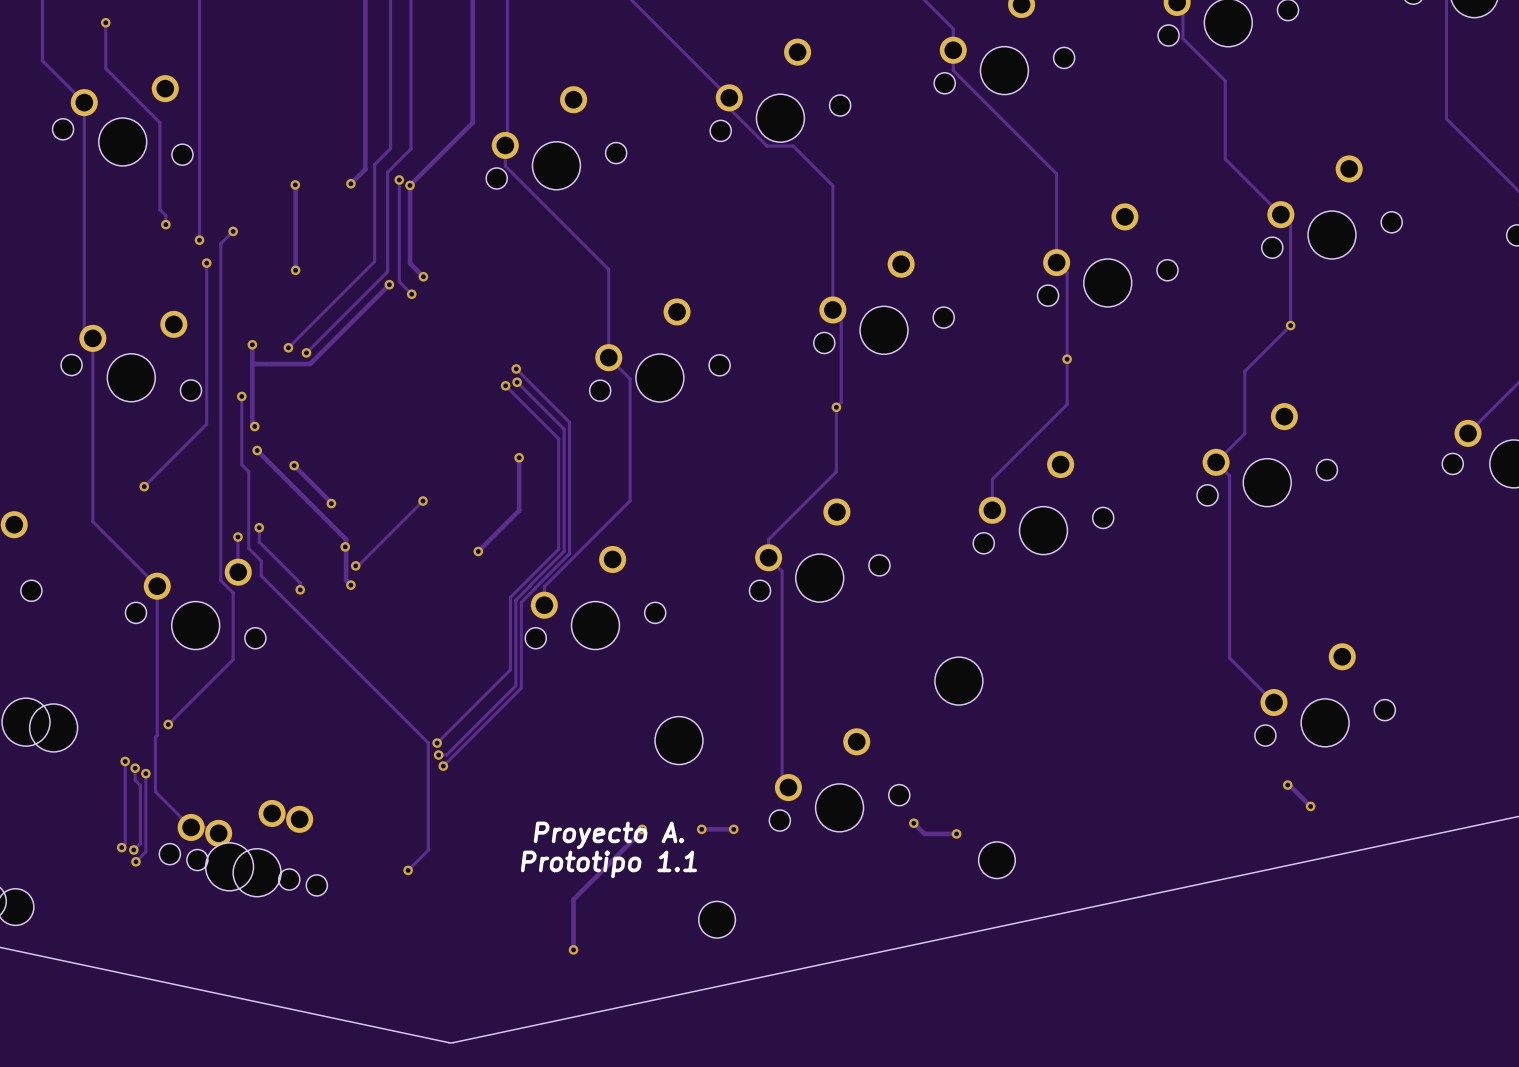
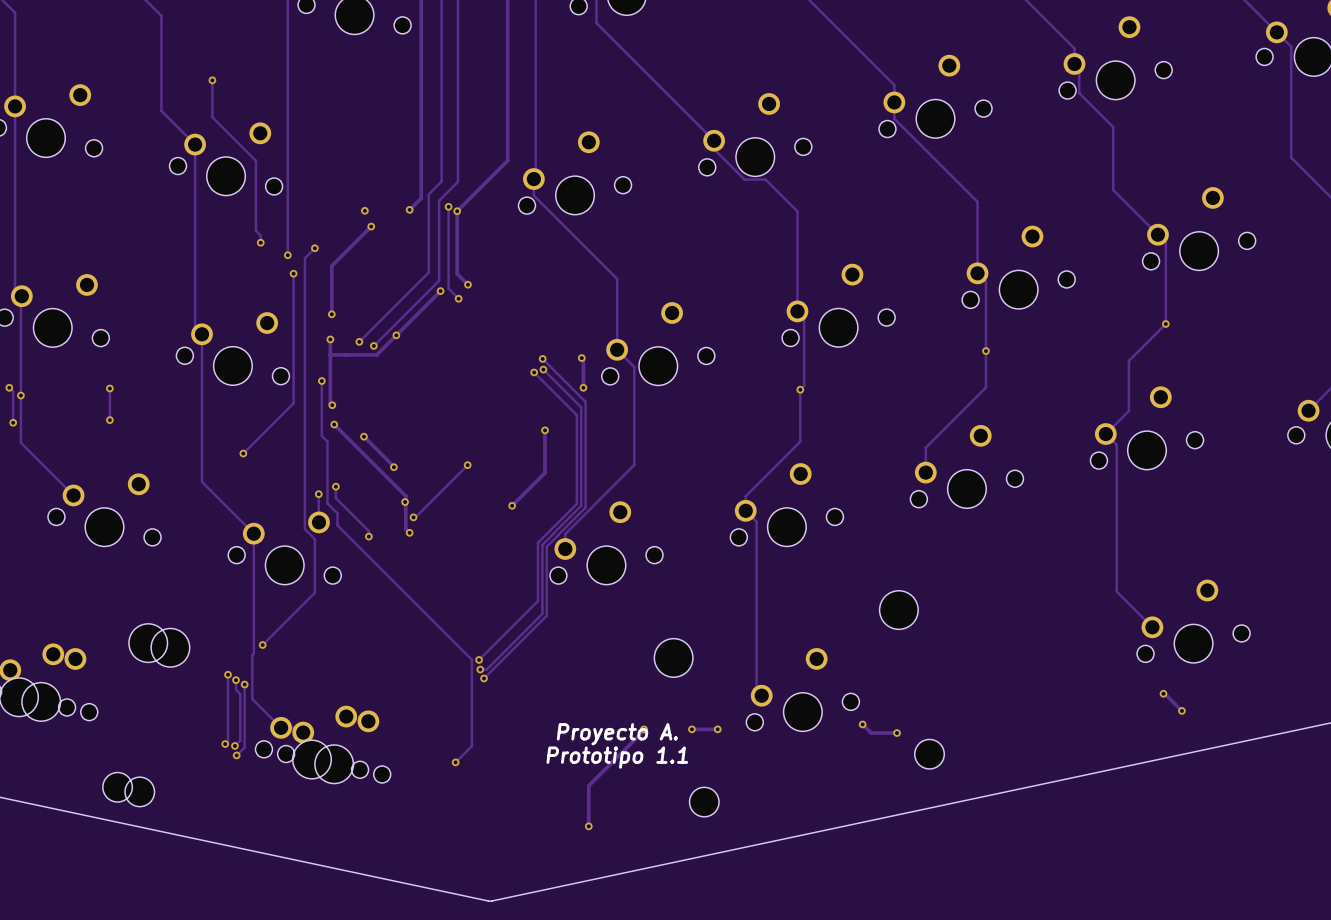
track: (295, 185) (295, 270) -> none
track: none -> (371, 226) (331, 265) (331, 314)
via: none -> (371, 226)
via: (295, 270) -> none
via: none -> (331, 314)
via: none -> (396, 335)
track: none -> (581, 358) (583, 359) (583, 387)
via: none -> (581, 358)
via: none -> (583, 387)

